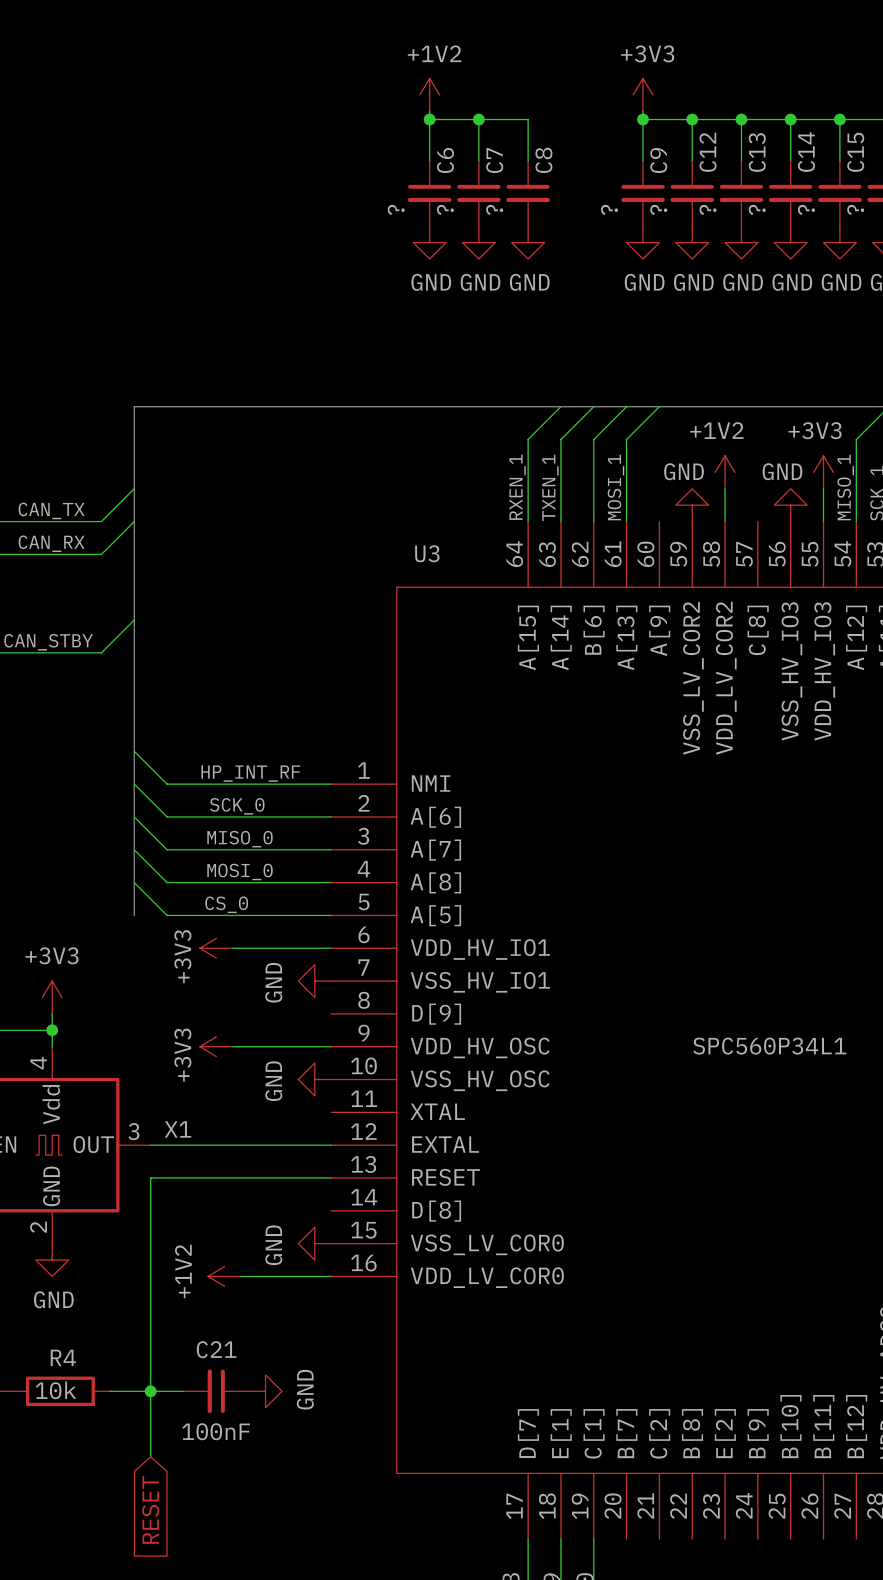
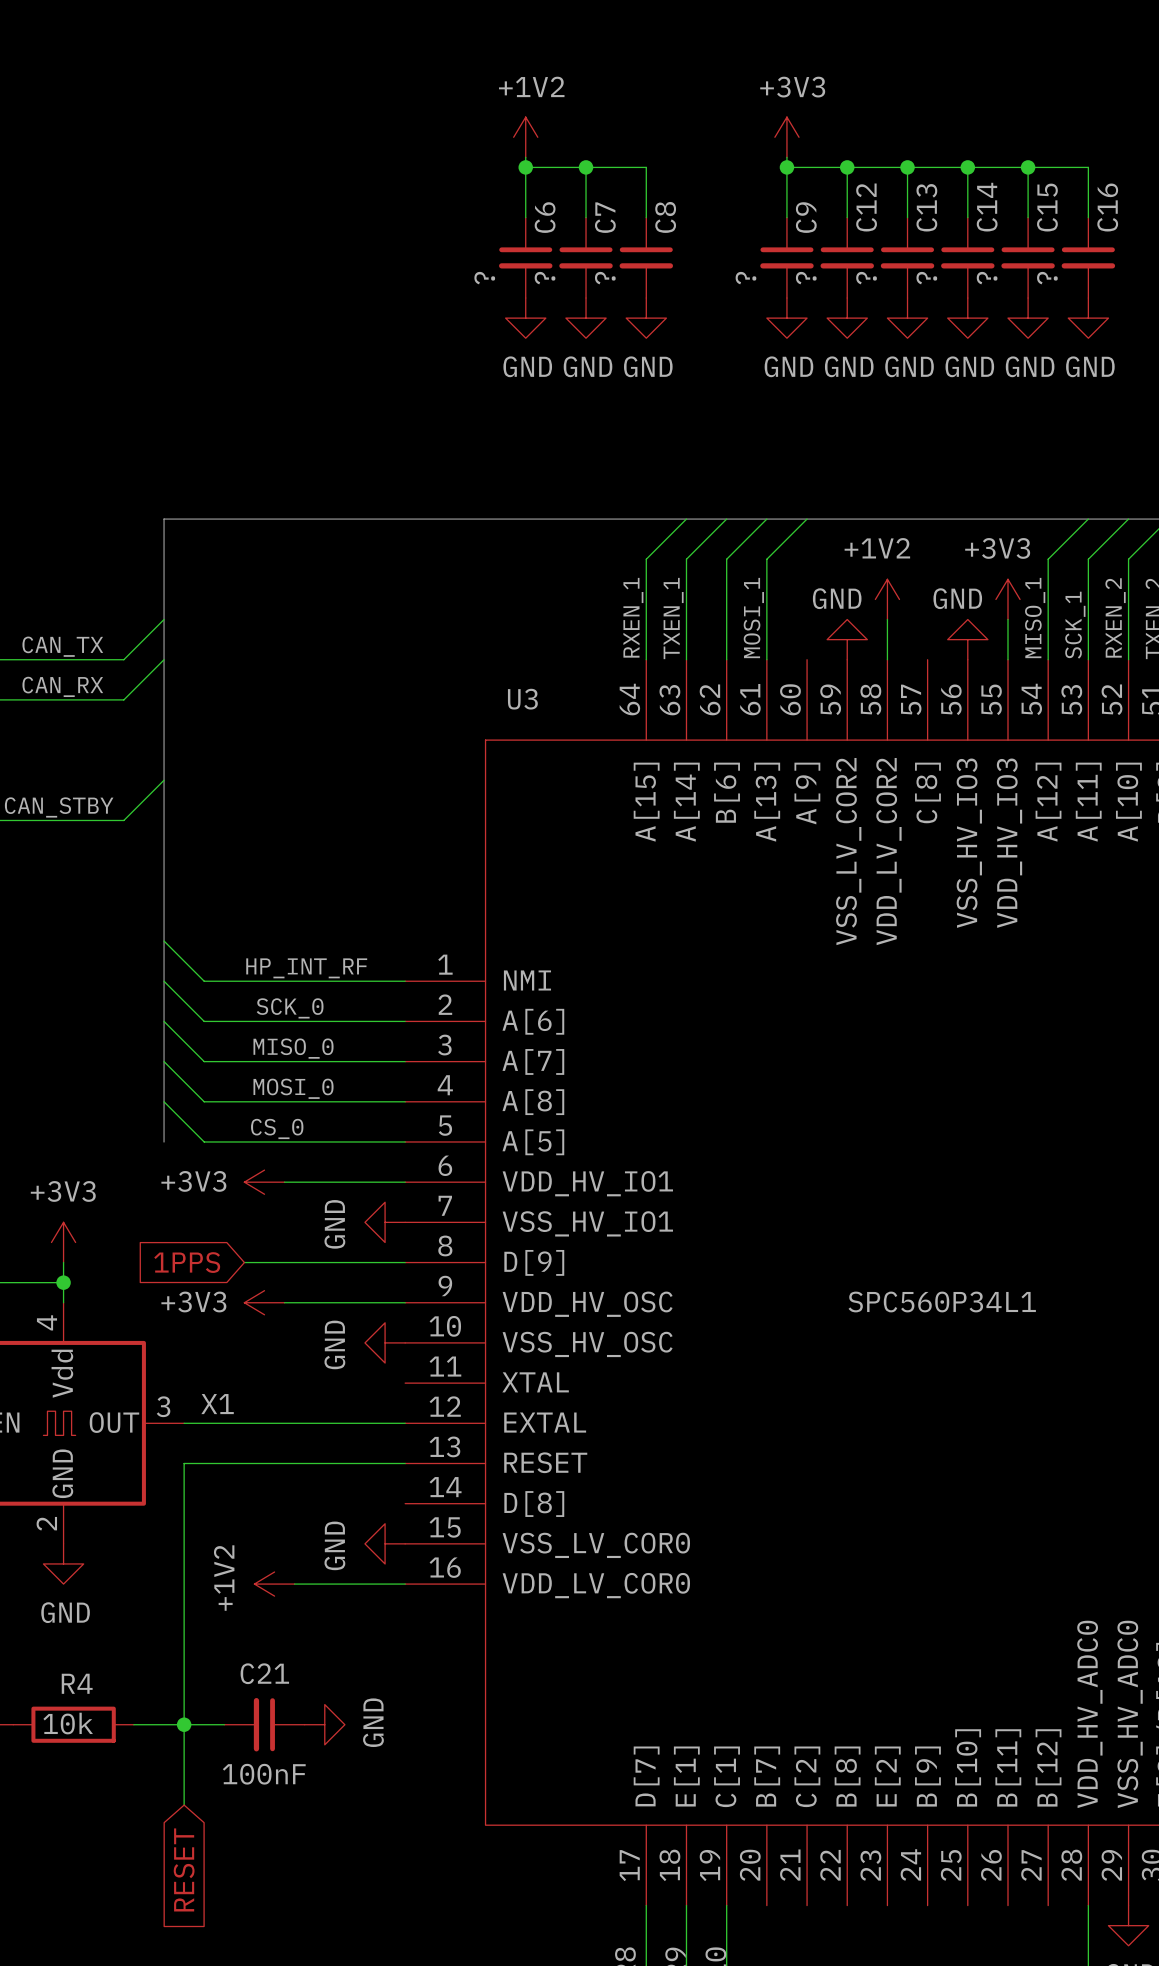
power symbol text rotation: 0° (182, 956) -> 90° clockwise (193, 1181)
global label: none -> 1PPS (187, 1262)
wire: none -> (244, 1262) (405, 1262)
power symbol text rotation: 0° (182, 1055) -> 90° clockwise (193, 1301)

